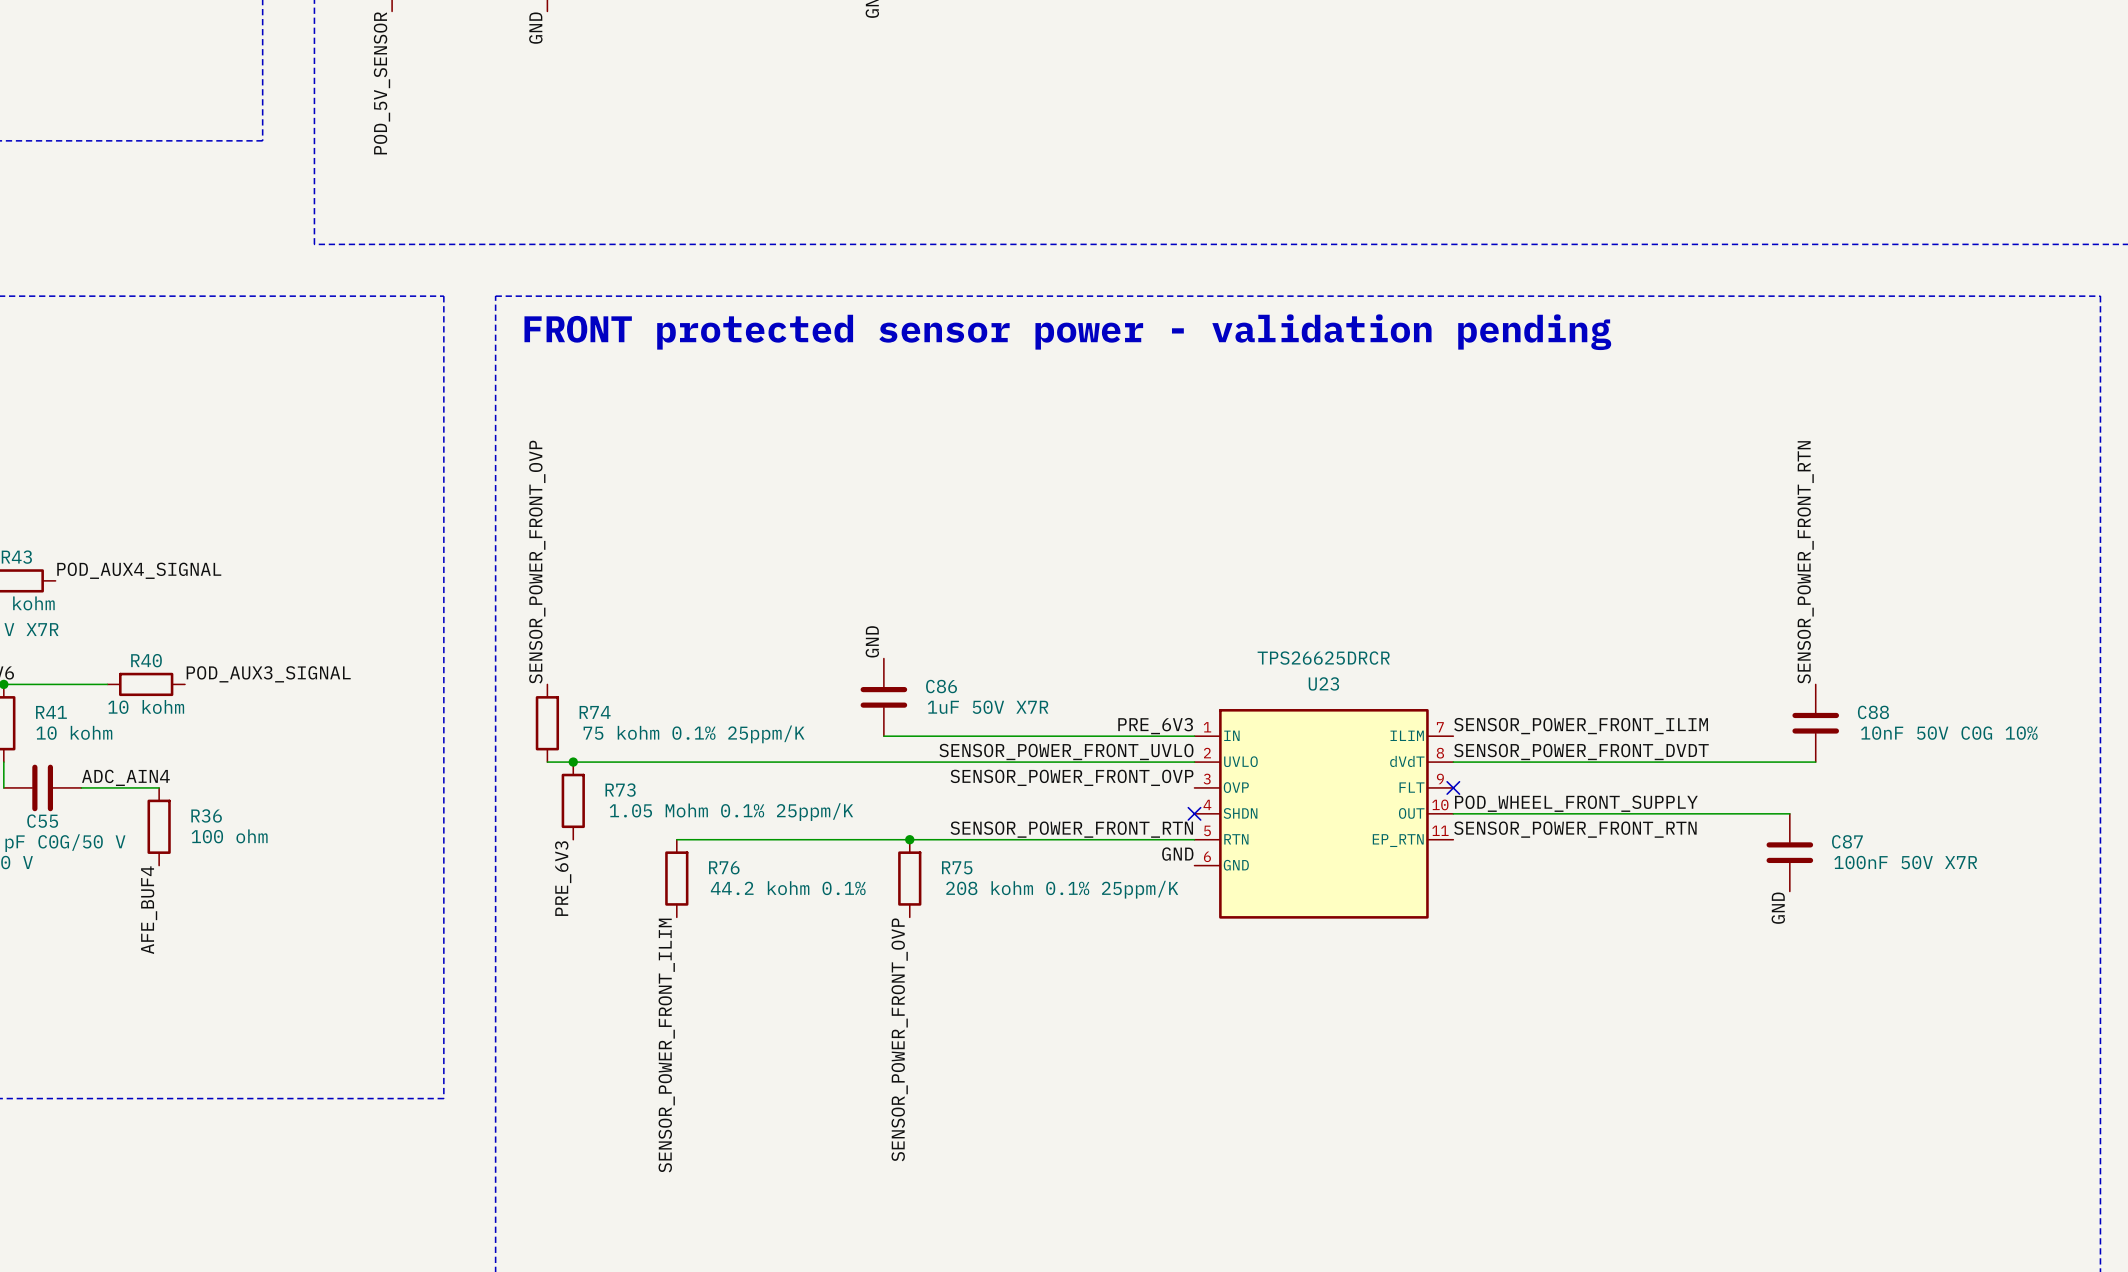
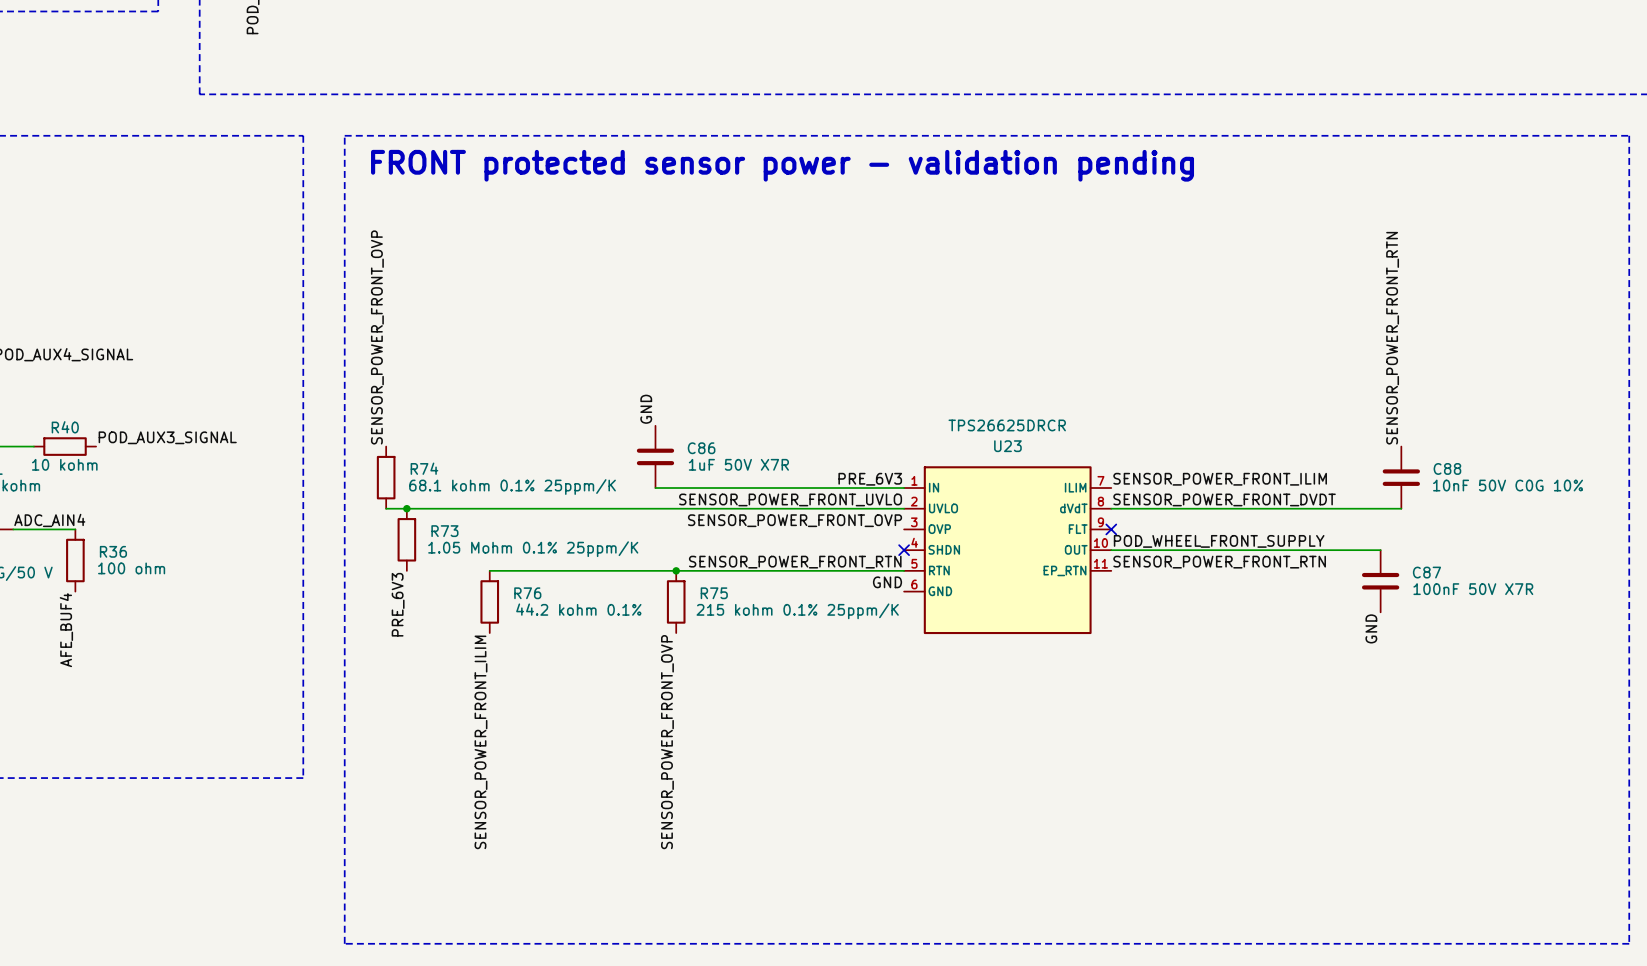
R74 value: 75 kohm 0.1% 25ppm/K (694, 734) -> 68.1 kohm 0.1% 25ppm/K (512, 487)
R75 value: 208 kohm 0.1% 25ppm/K (1062, 889) -> 215 kohm 0.1% 25ppm/K (797, 611)

